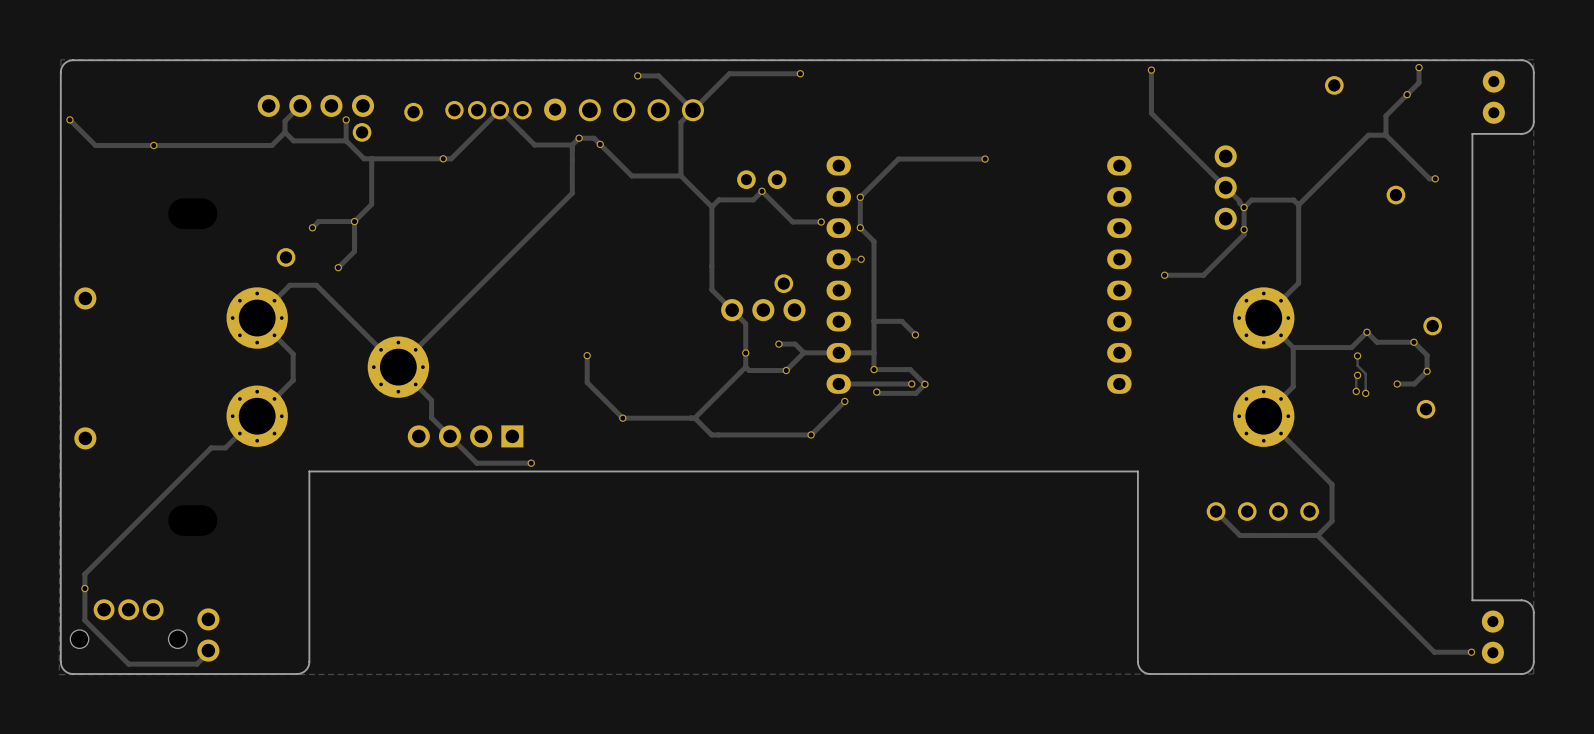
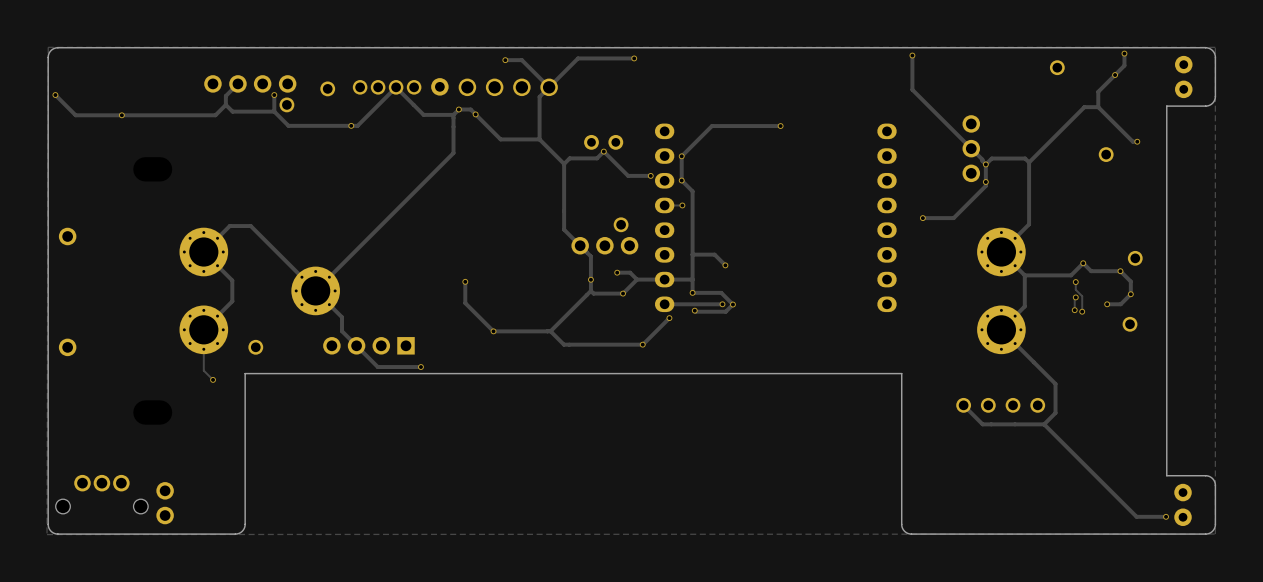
track: (371, 158) (371, 204) (354, 221) -> none
track: (354, 221) (354, 251) (338, 267) -> none
track: (354, 221) (318, 221) (312, 227) -> none
via: (354, 221) -> none
via: (312, 227) -> none
part position: (286, 257) -> (255, 347)
via: (338, 267) -> none
track: none -> (203, 329) (203, 370) (213, 379)
track: (239, 433) (225, 447) (211, 447) (84, 574) (84, 620) (128, 664) (197, 664) (208, 653) -> none
via: none -> (213, 379)
via: (84, 588) -> none

